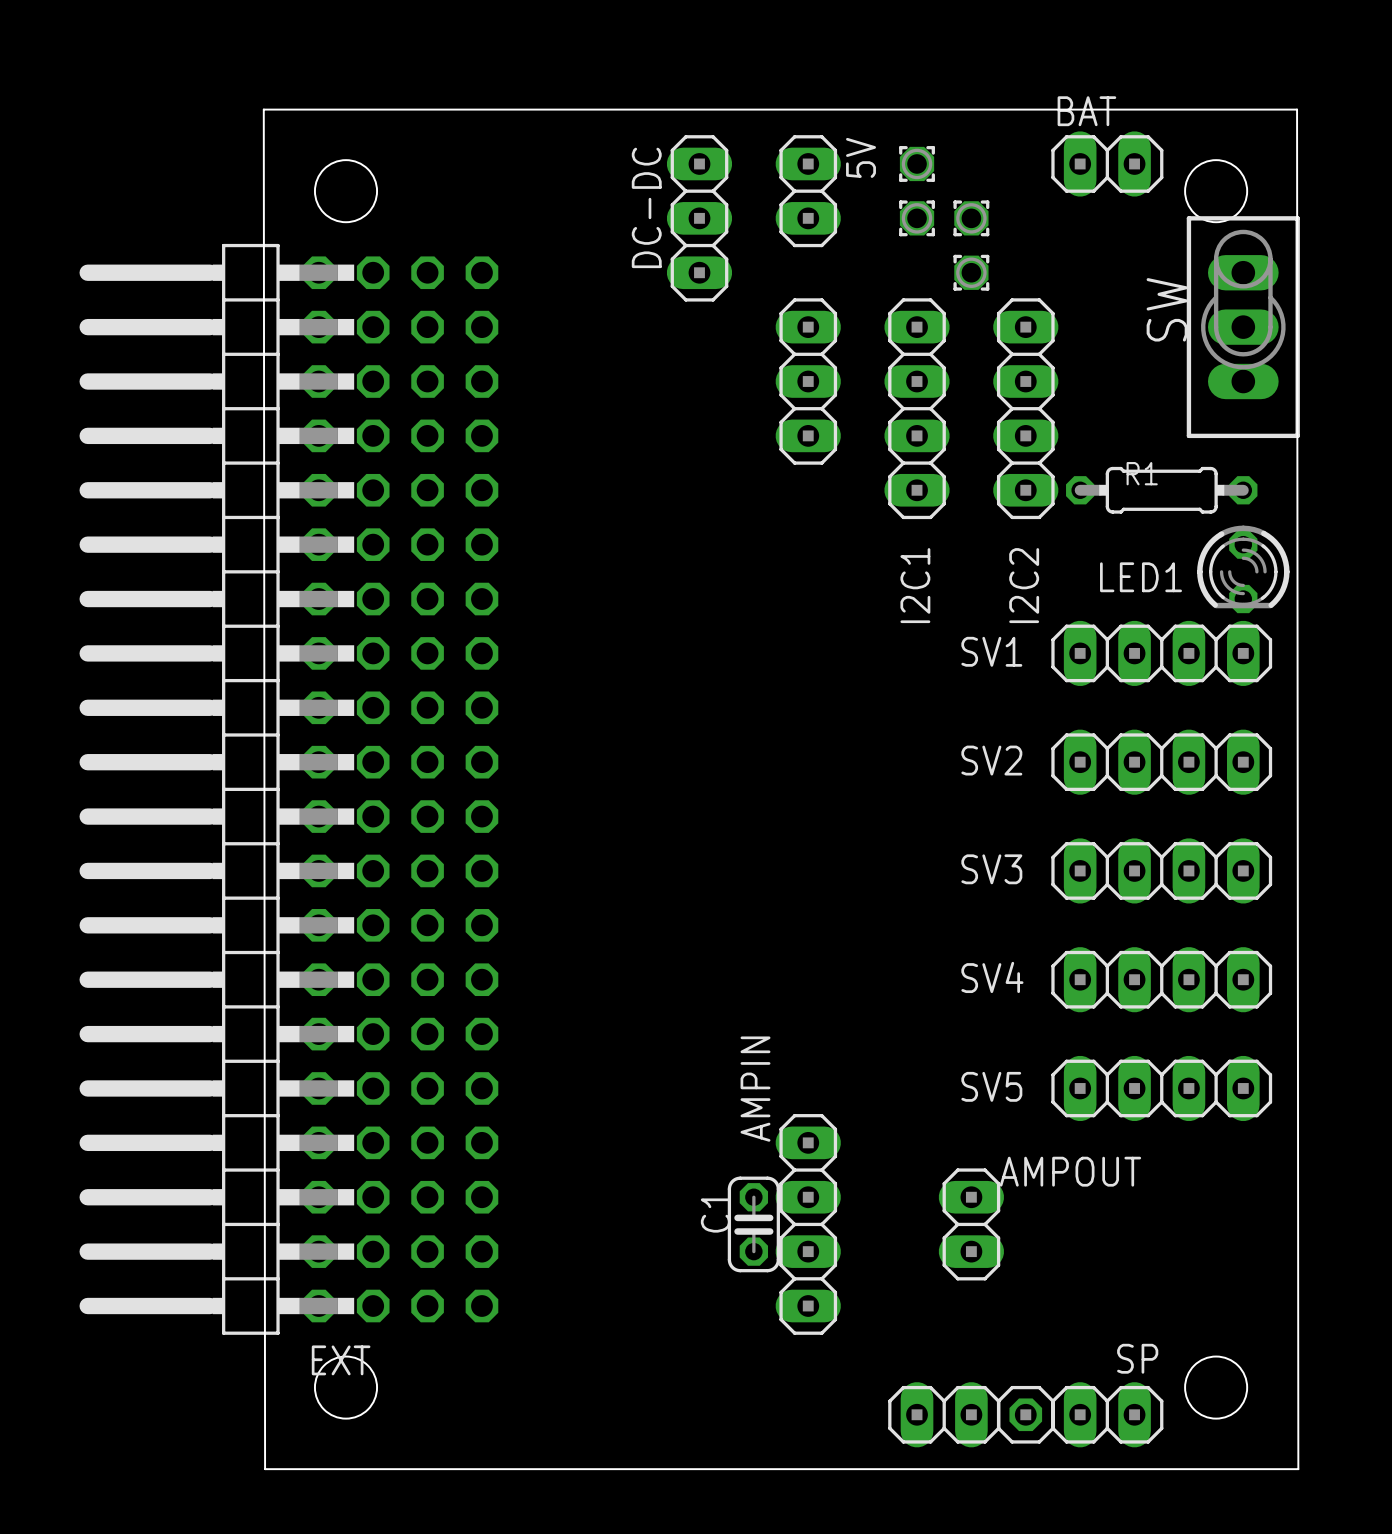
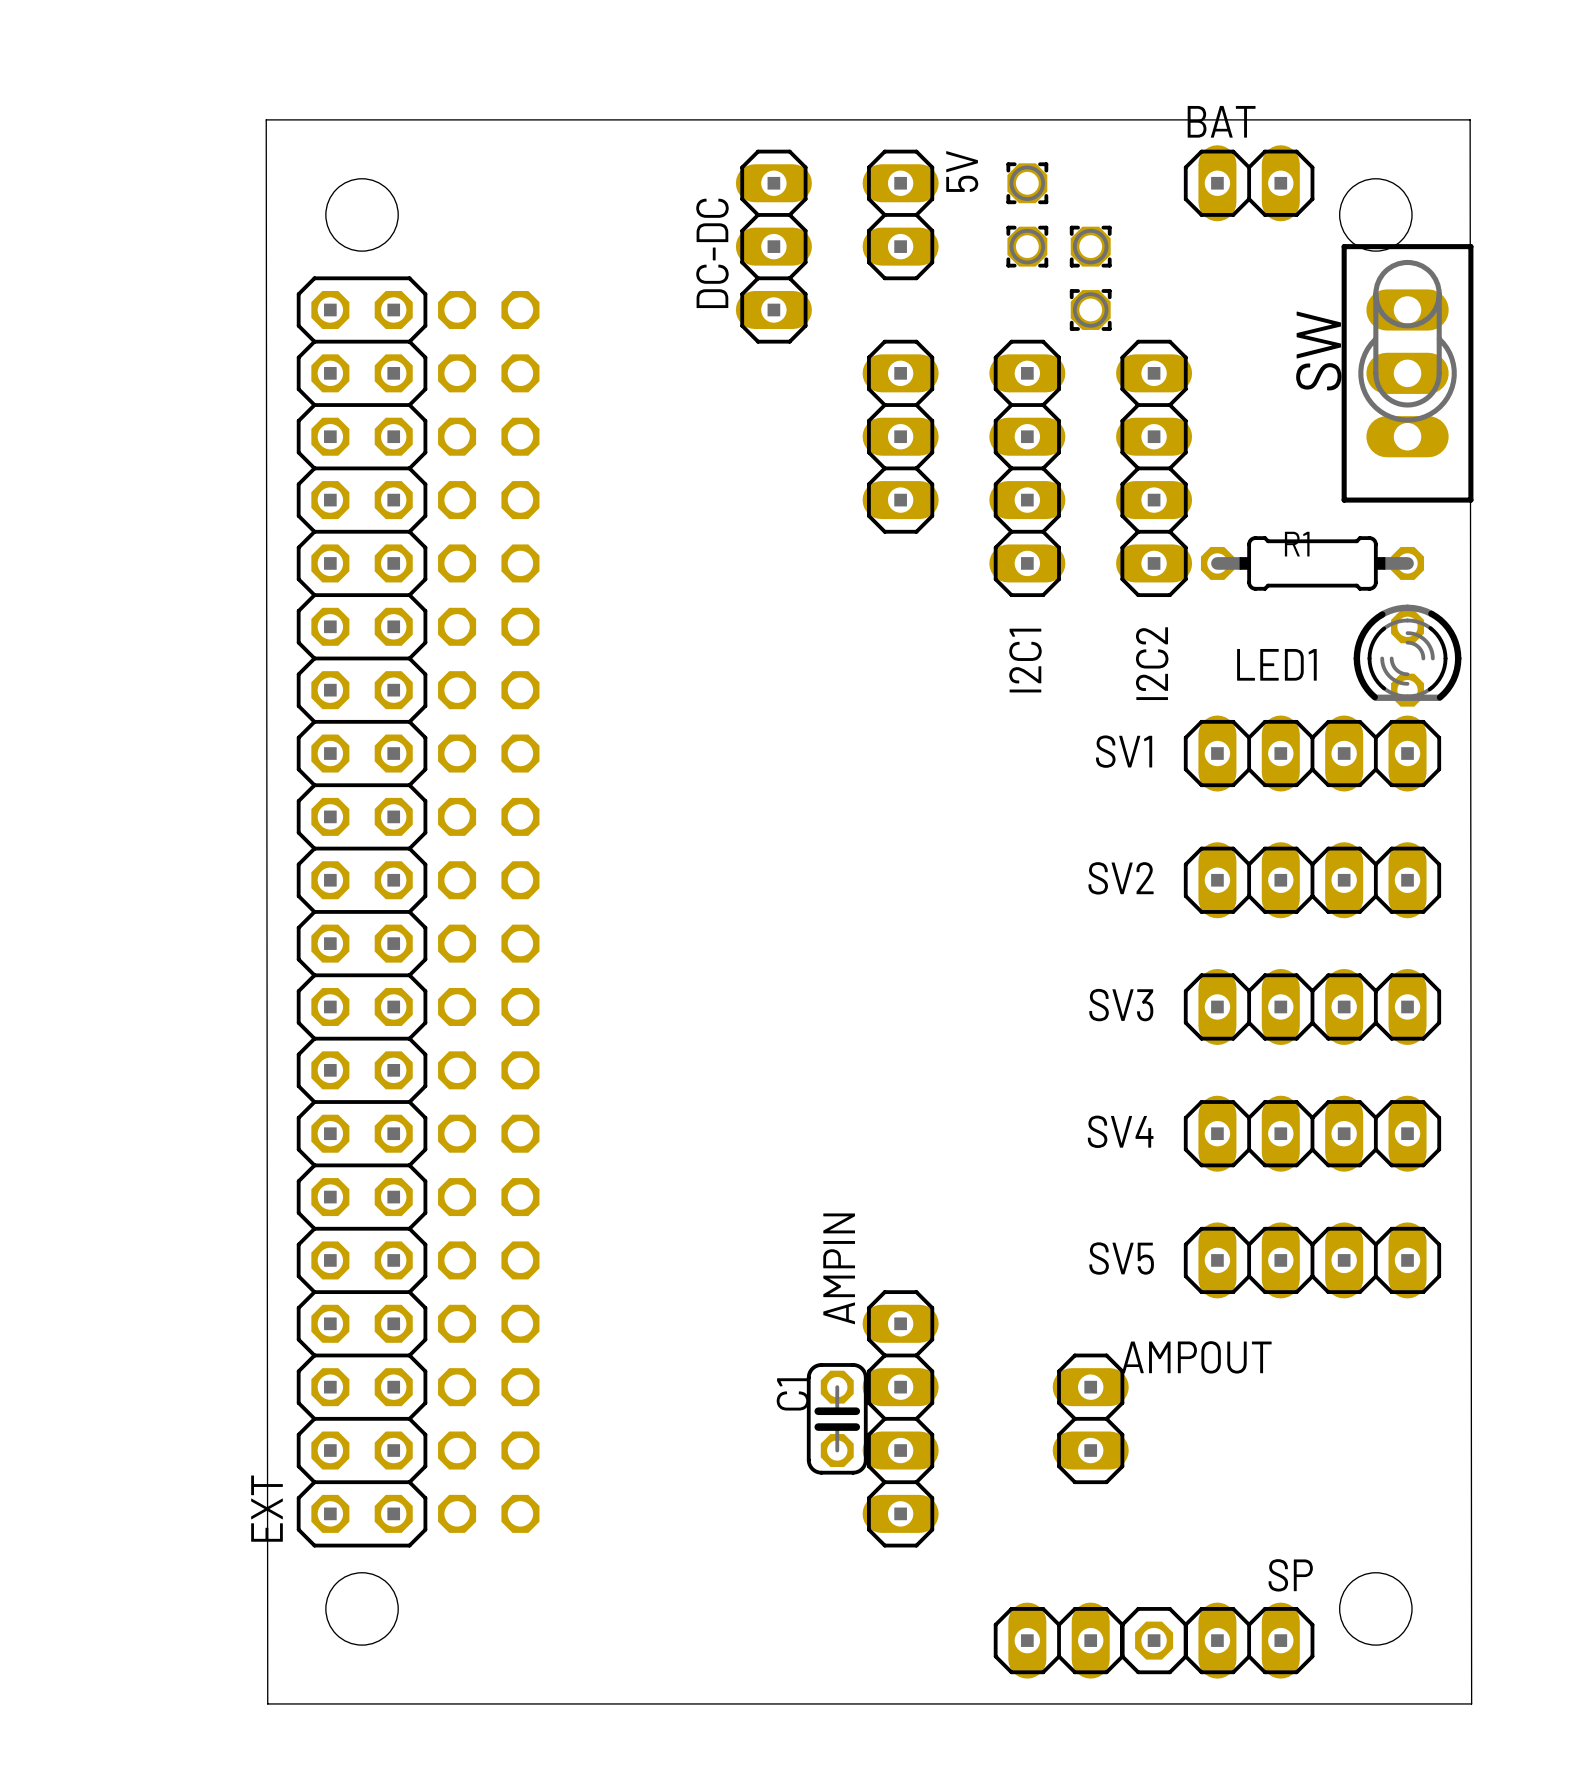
EXT: (234, 789) -> none
EXT: none -> (362, 911)

